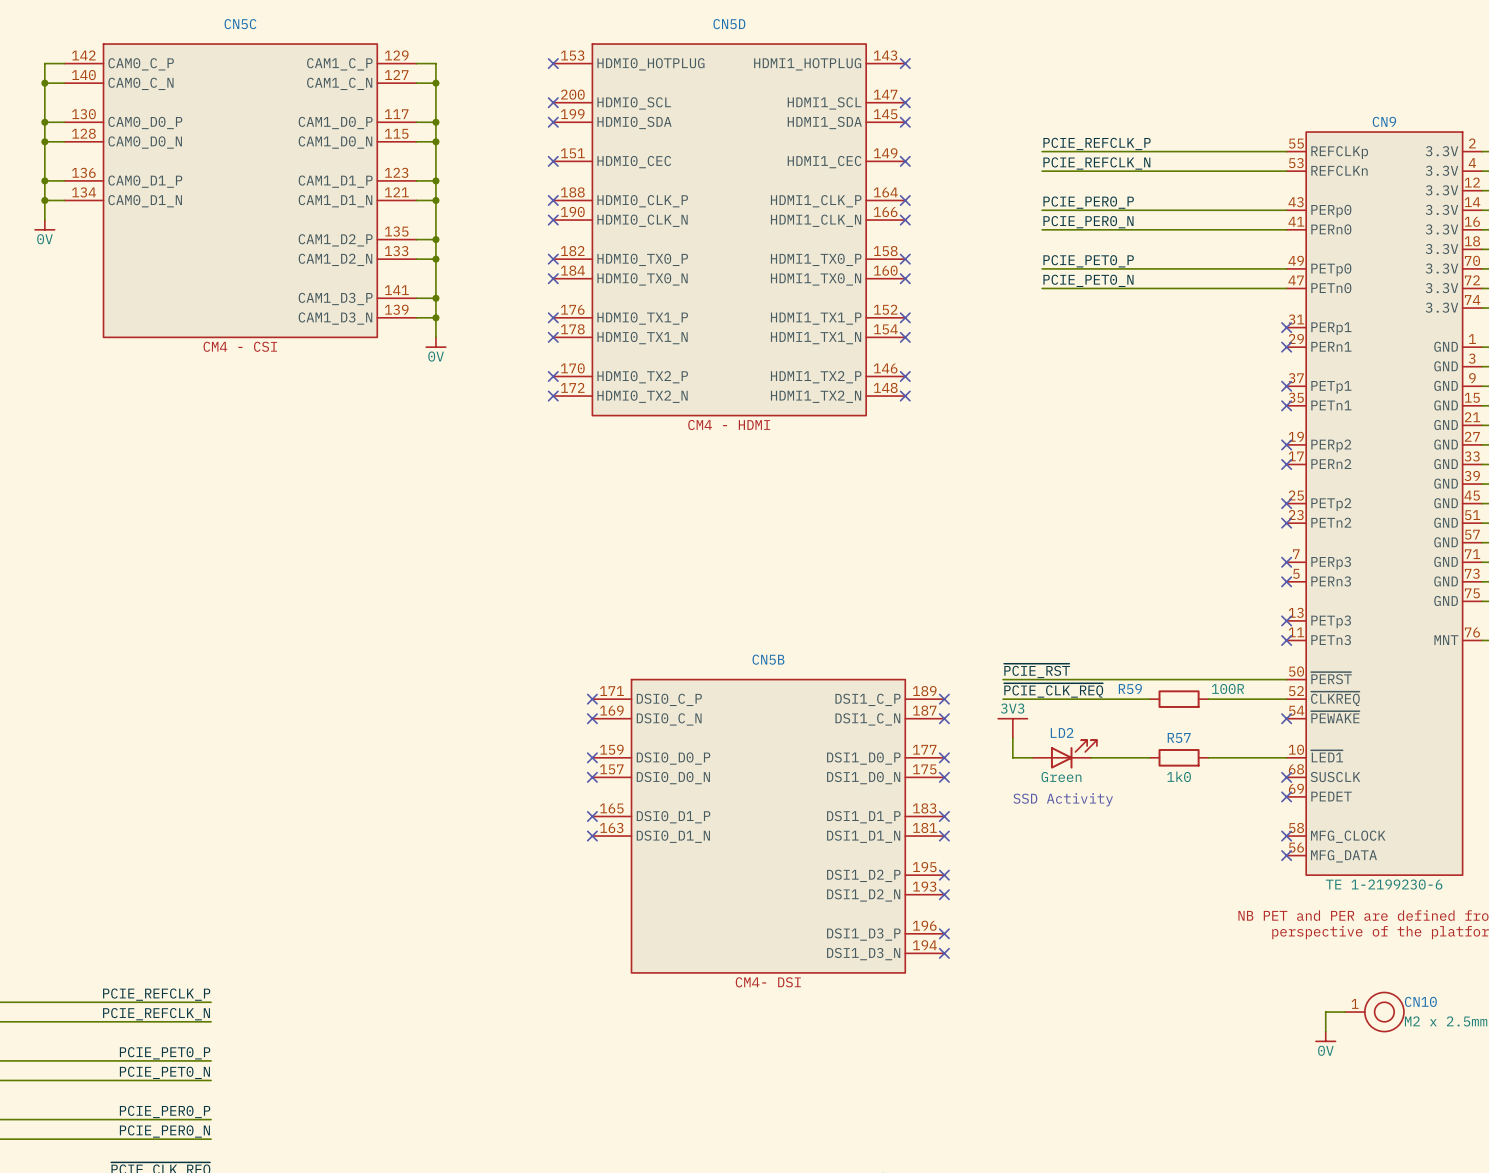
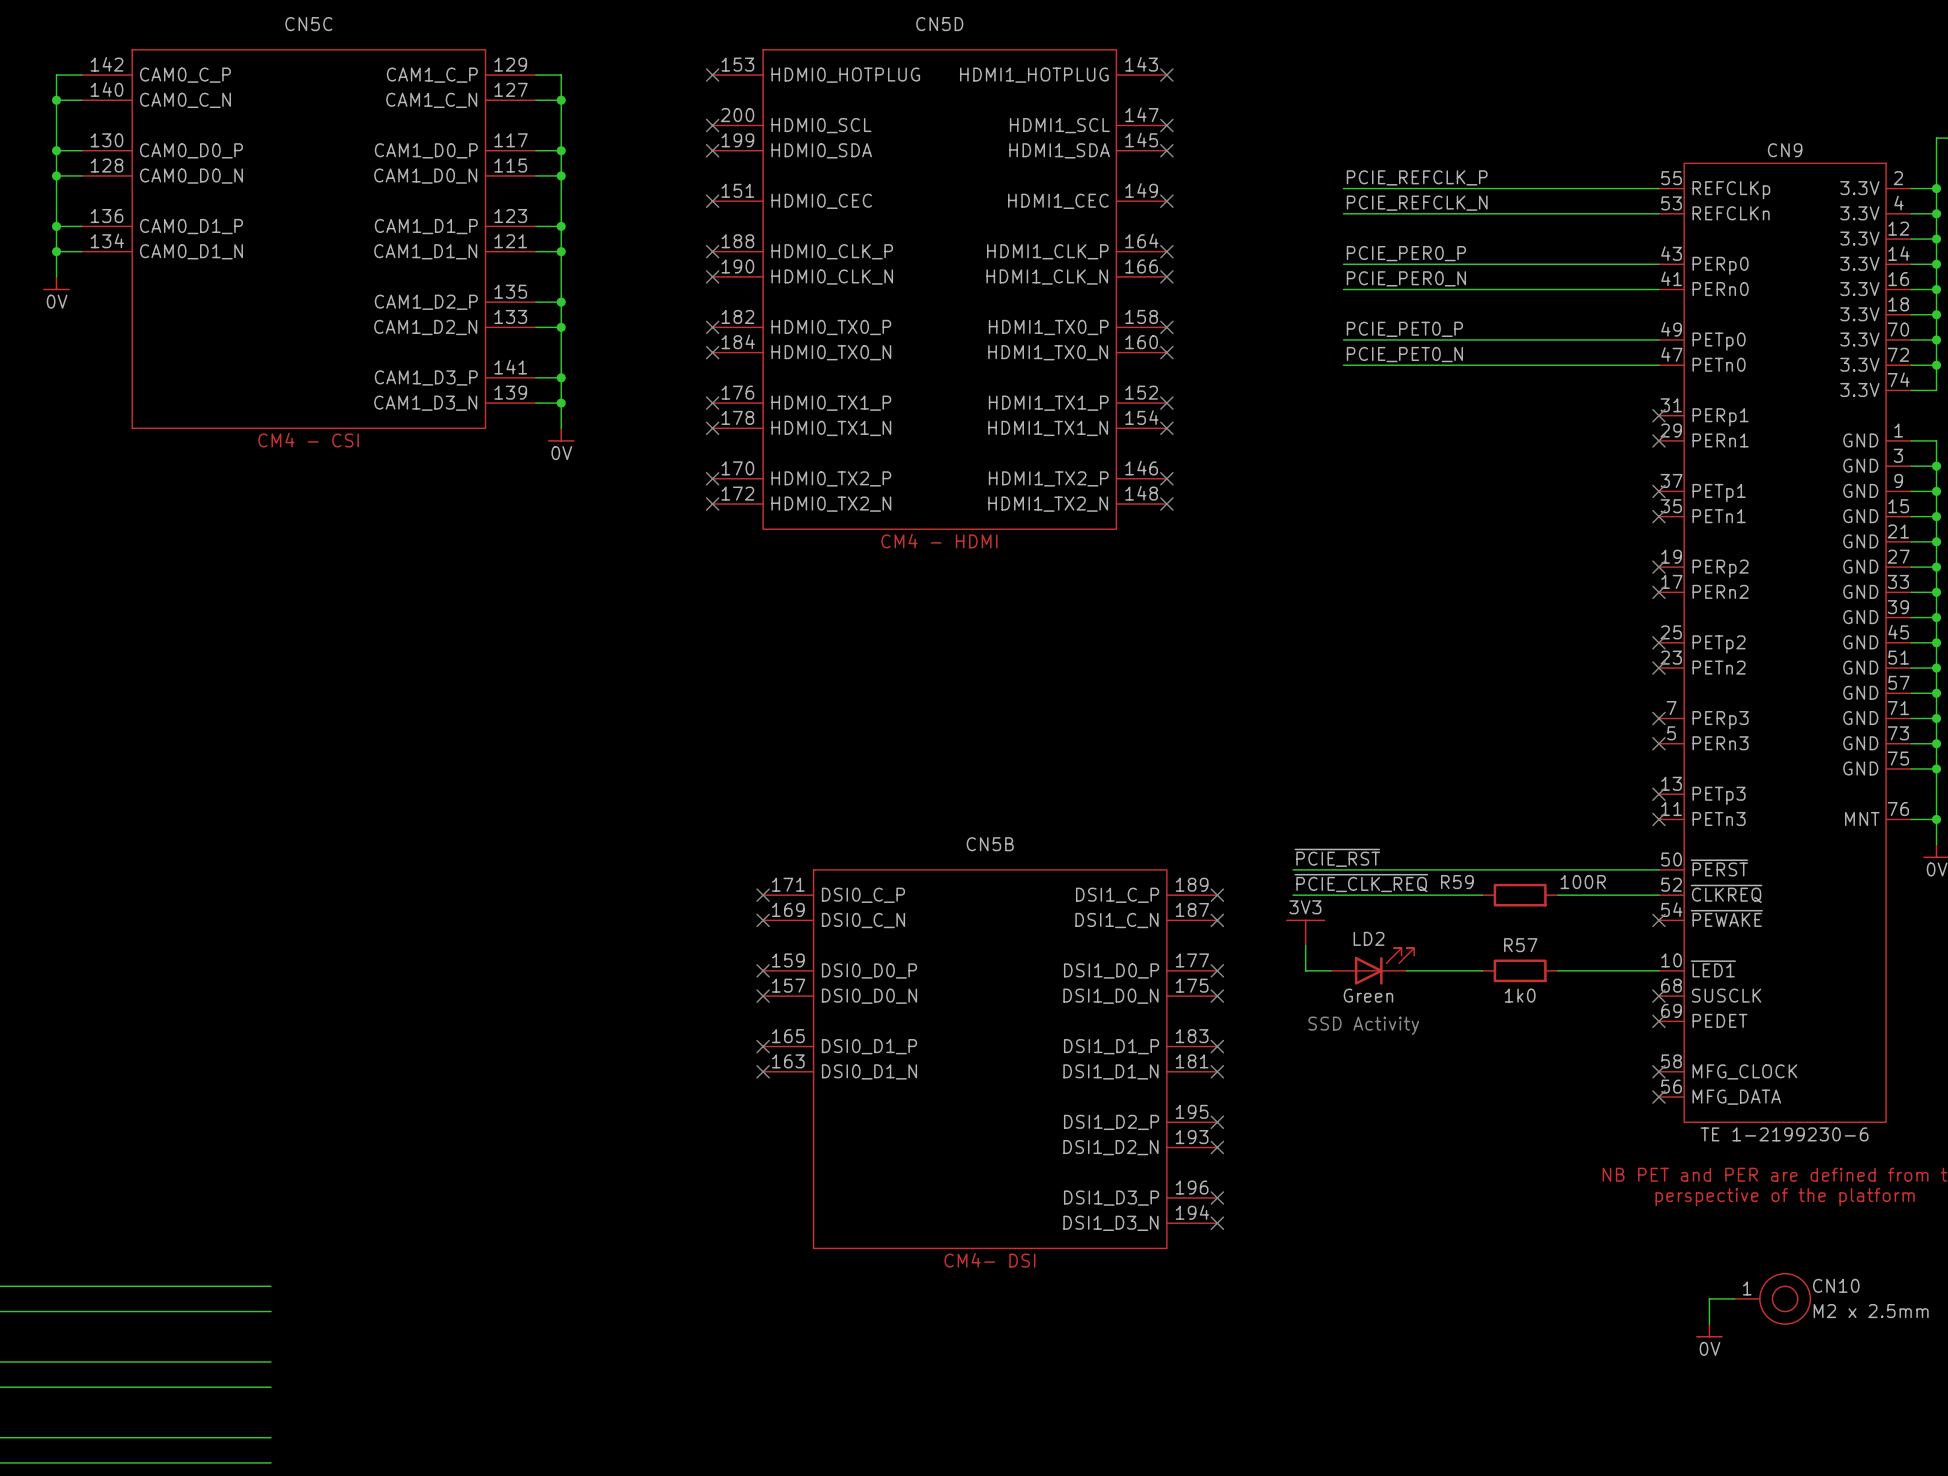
label: PCIE_REFCLK_P (156, 994) -> none
label: PCIE_REFCLK_N (156, 1014) -> none
label: PCIE_PET0_P (165, 1053) -> none
label: PCIE_PET0_N (164, 1072) -> none
label: PCIE_PER0_P (165, 1111) -> none
label: PCIE_PER0_N (164, 1131) -> none

